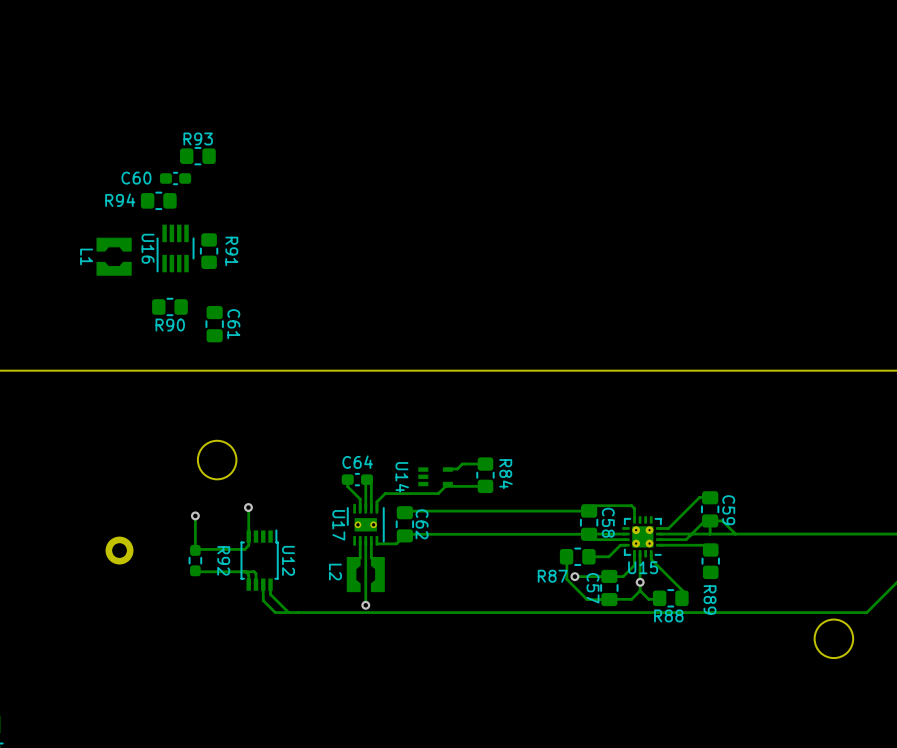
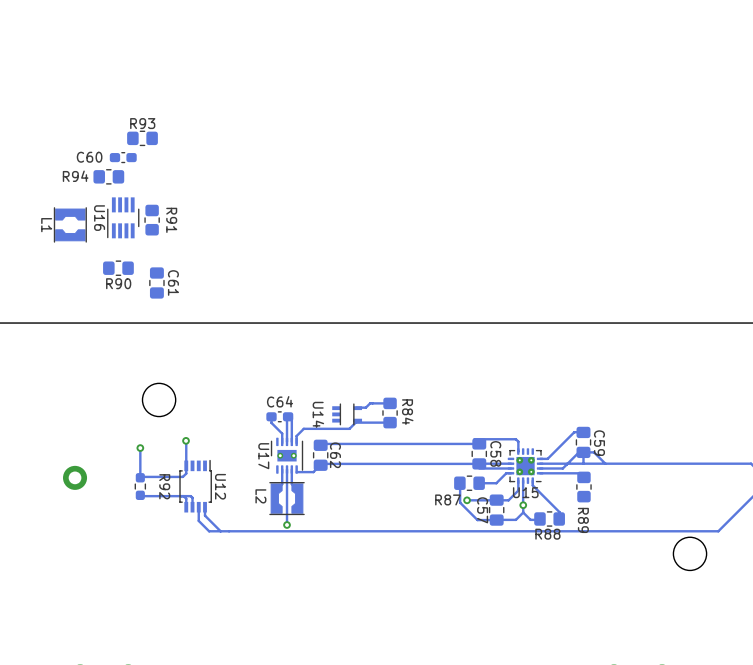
L1 footprint: [96, 237, 132, 276] -> [53, 207, 87, 243]
U14 footprint: [418, 467, 453, 487] -> [332, 403, 363, 426]
L2 footprint: [346, 556, 385, 593] -> [269, 482, 305, 516]

